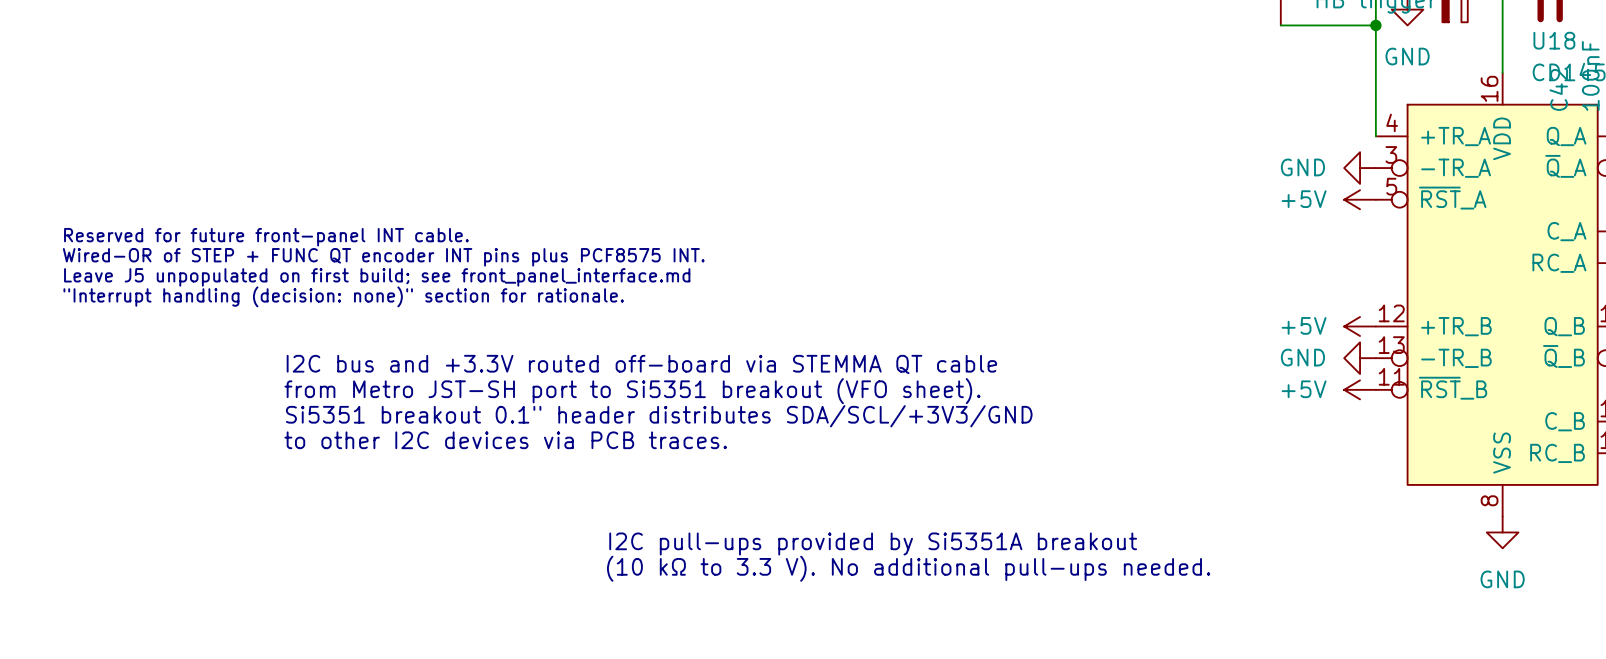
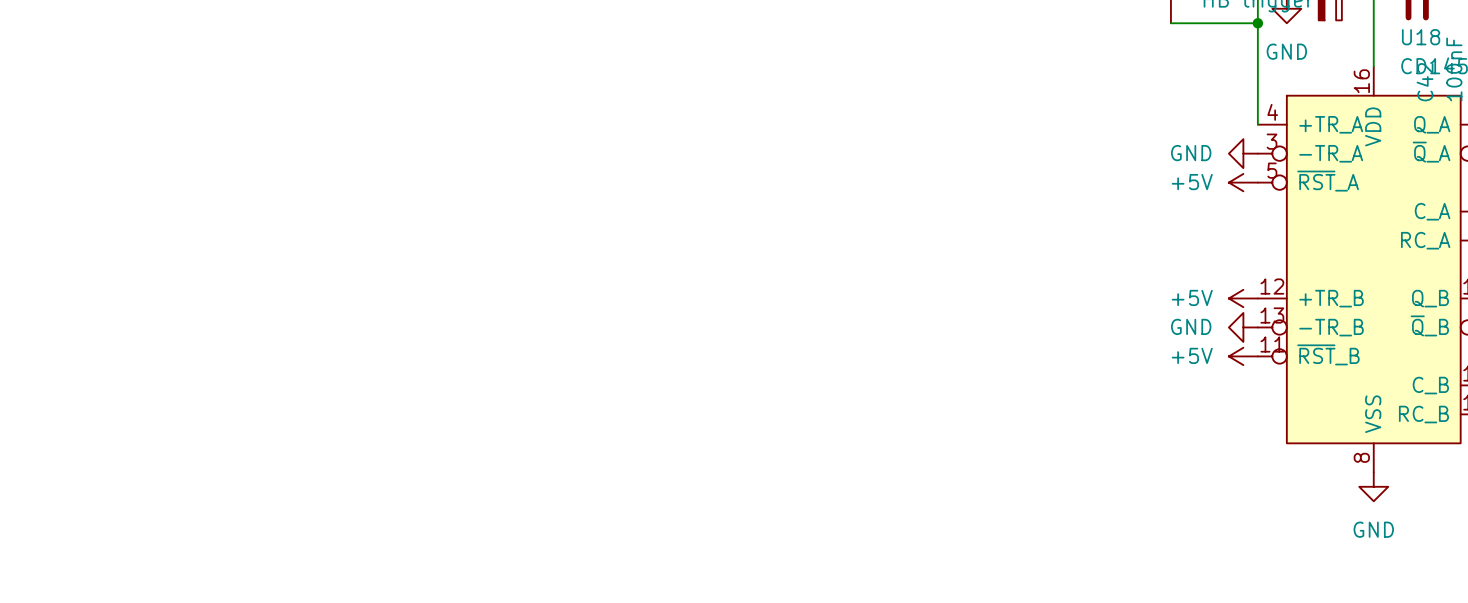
text: Reserved for future front-panel INT cable. (266, 237) -> none
text: Wired-OR of STEP + FUNC QT encoder INT pins plus PCF8575 INT. (383, 257) -> none
text: Leave J5 unpopulated on first build; see front_panel_interface.md (377, 277) -> none
text: "Interrupt handling (decision: none)" section for rationale. (343, 296) -> none
text: I2C bus and +3.3V routed off-board via STEMMA QT cable (641, 364) -> none
text: from Metro JST-SH port to Si5351 breakout (VFO sheet). (632, 391) -> none
text: Si5351 breakout 0.1" header distributes SDA/SCL/+3V3/GND (659, 416) -> none
text: to other I2C devices via PCB traces. (505, 440) -> none
text: I2C pull-ups provided by Si5351A breakout (873, 543) -> none
text: (10 kΩ to 3.3 V). No additional pull-ups needed. (908, 568) -> none

